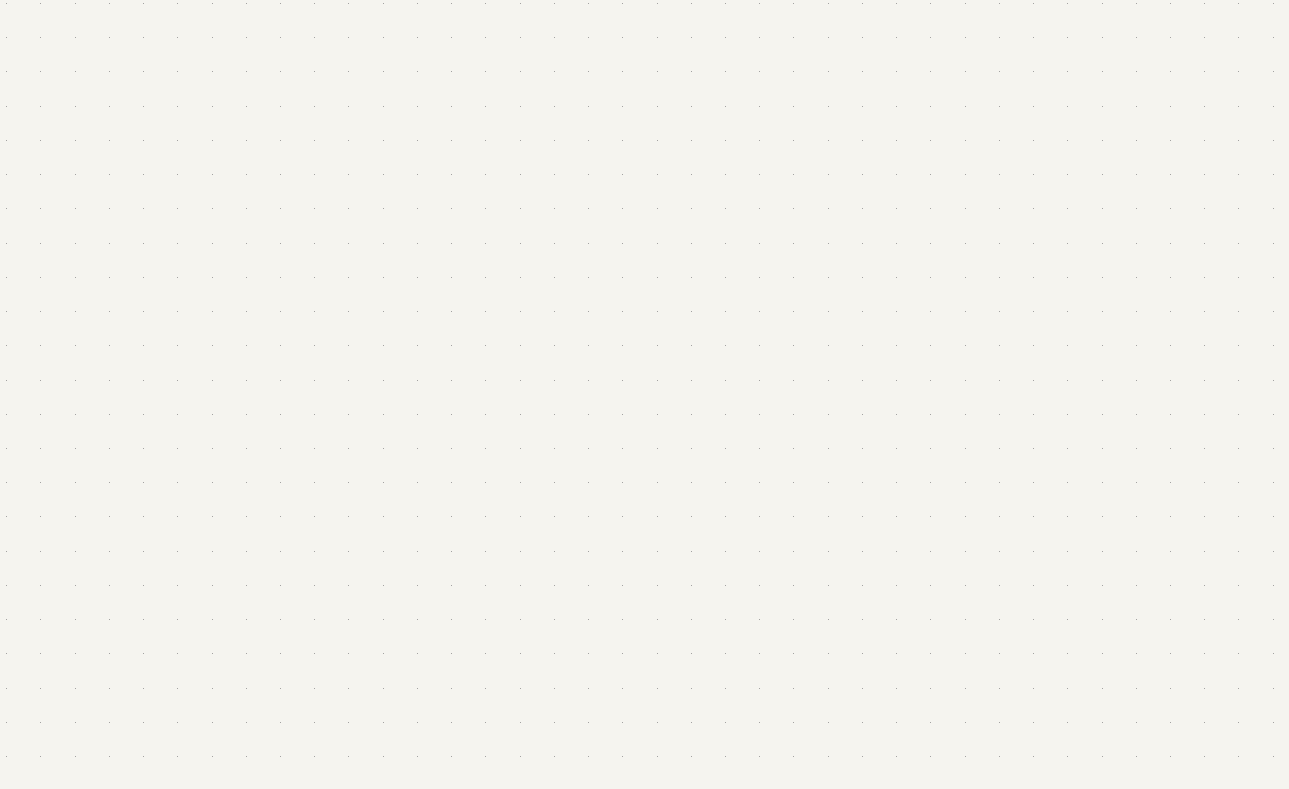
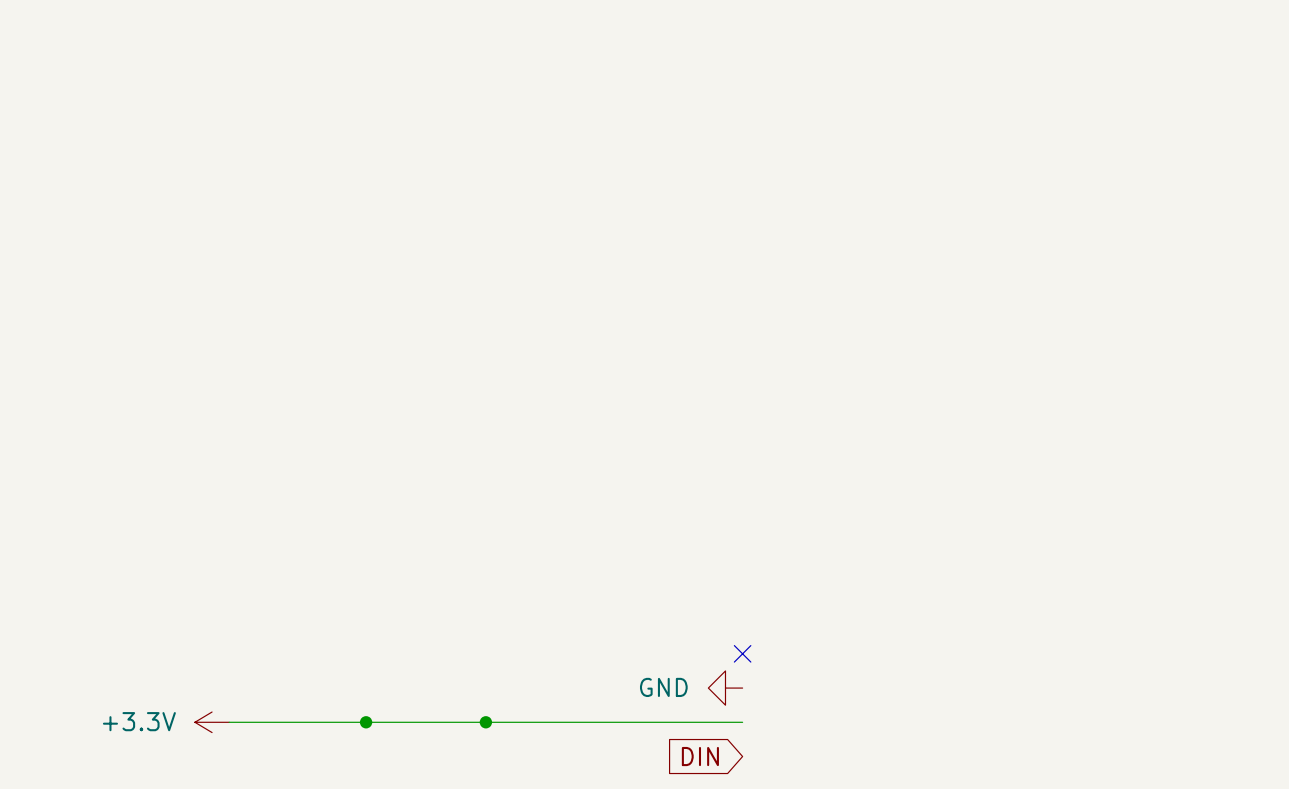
no-connect mark: none -> (742, 653)
power symbol: none -> GND (725, 688)
power symbol: none -> +3.3V (212, 722)
wire: none -> (229, 722) (742, 722)
junction: none -> (366, 722)
junction: none -> (485, 722)
global label: none -> DIN (700, 756)

